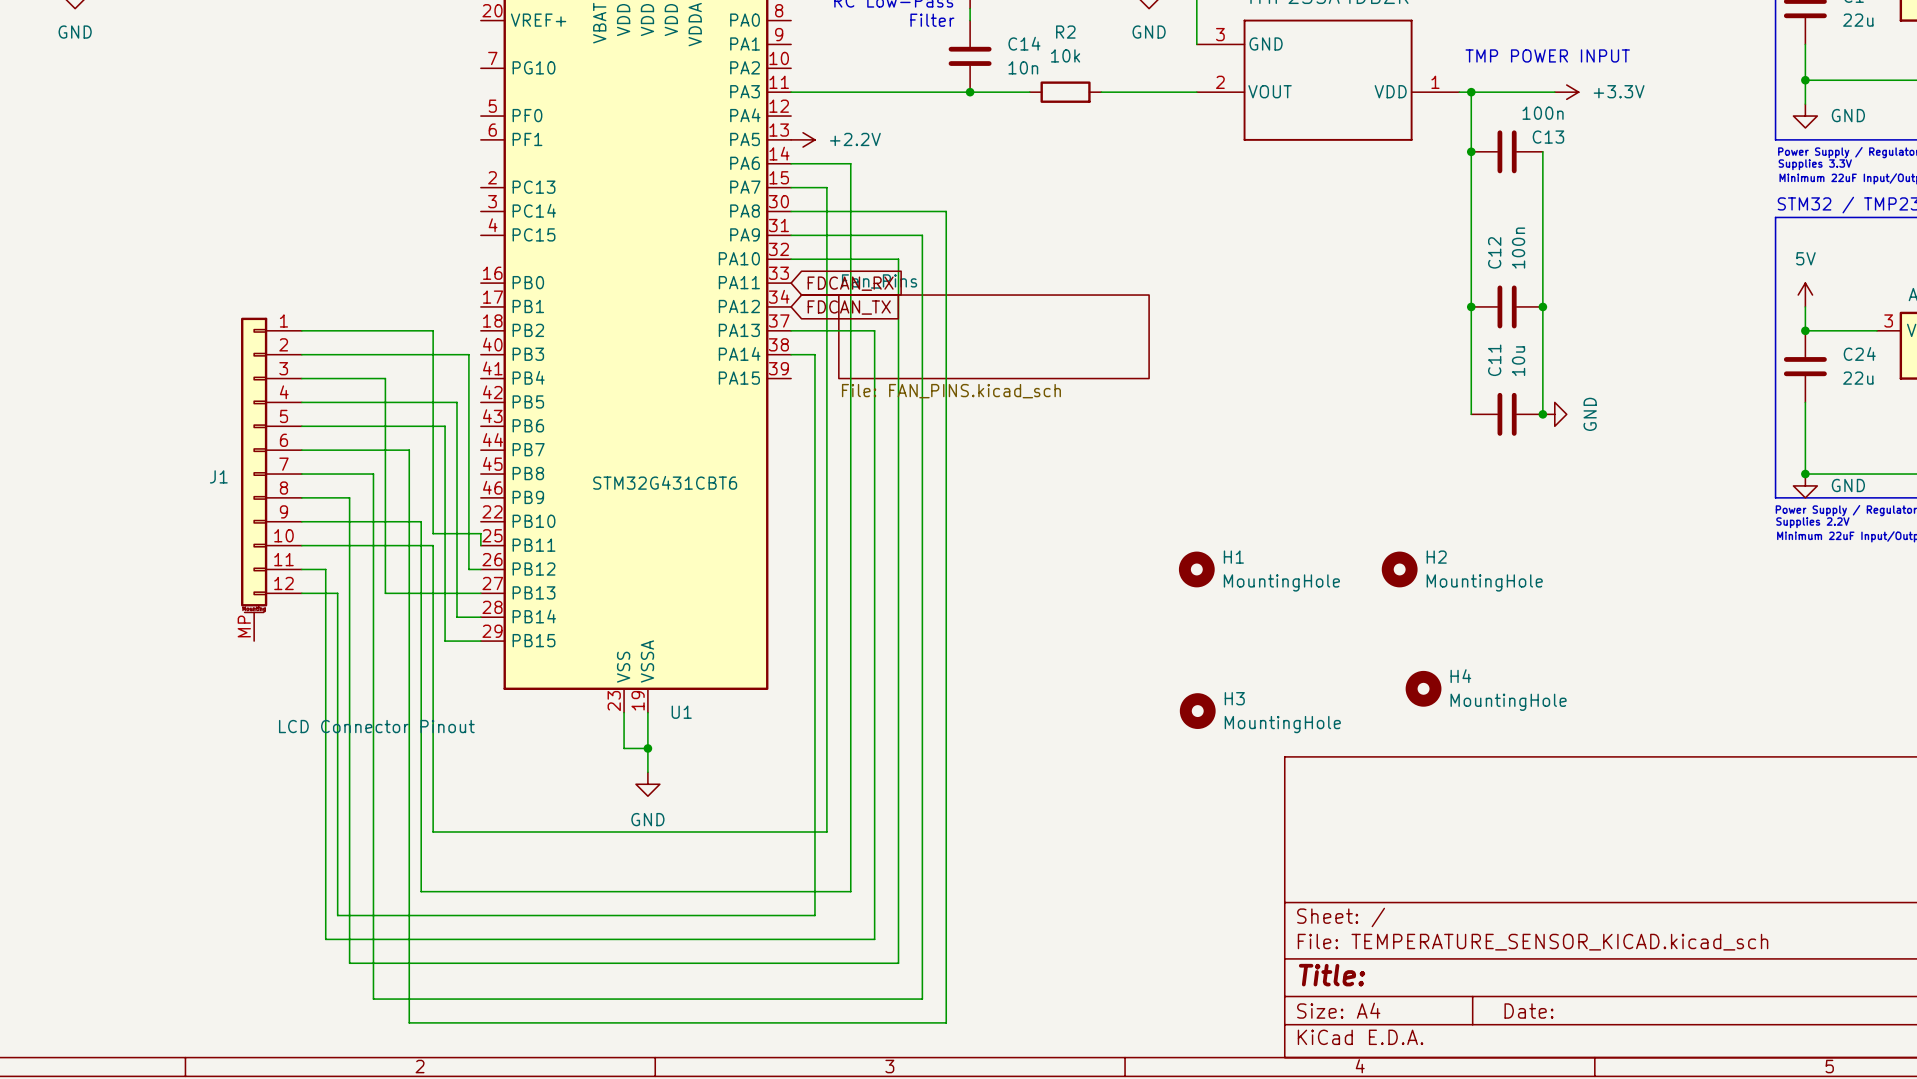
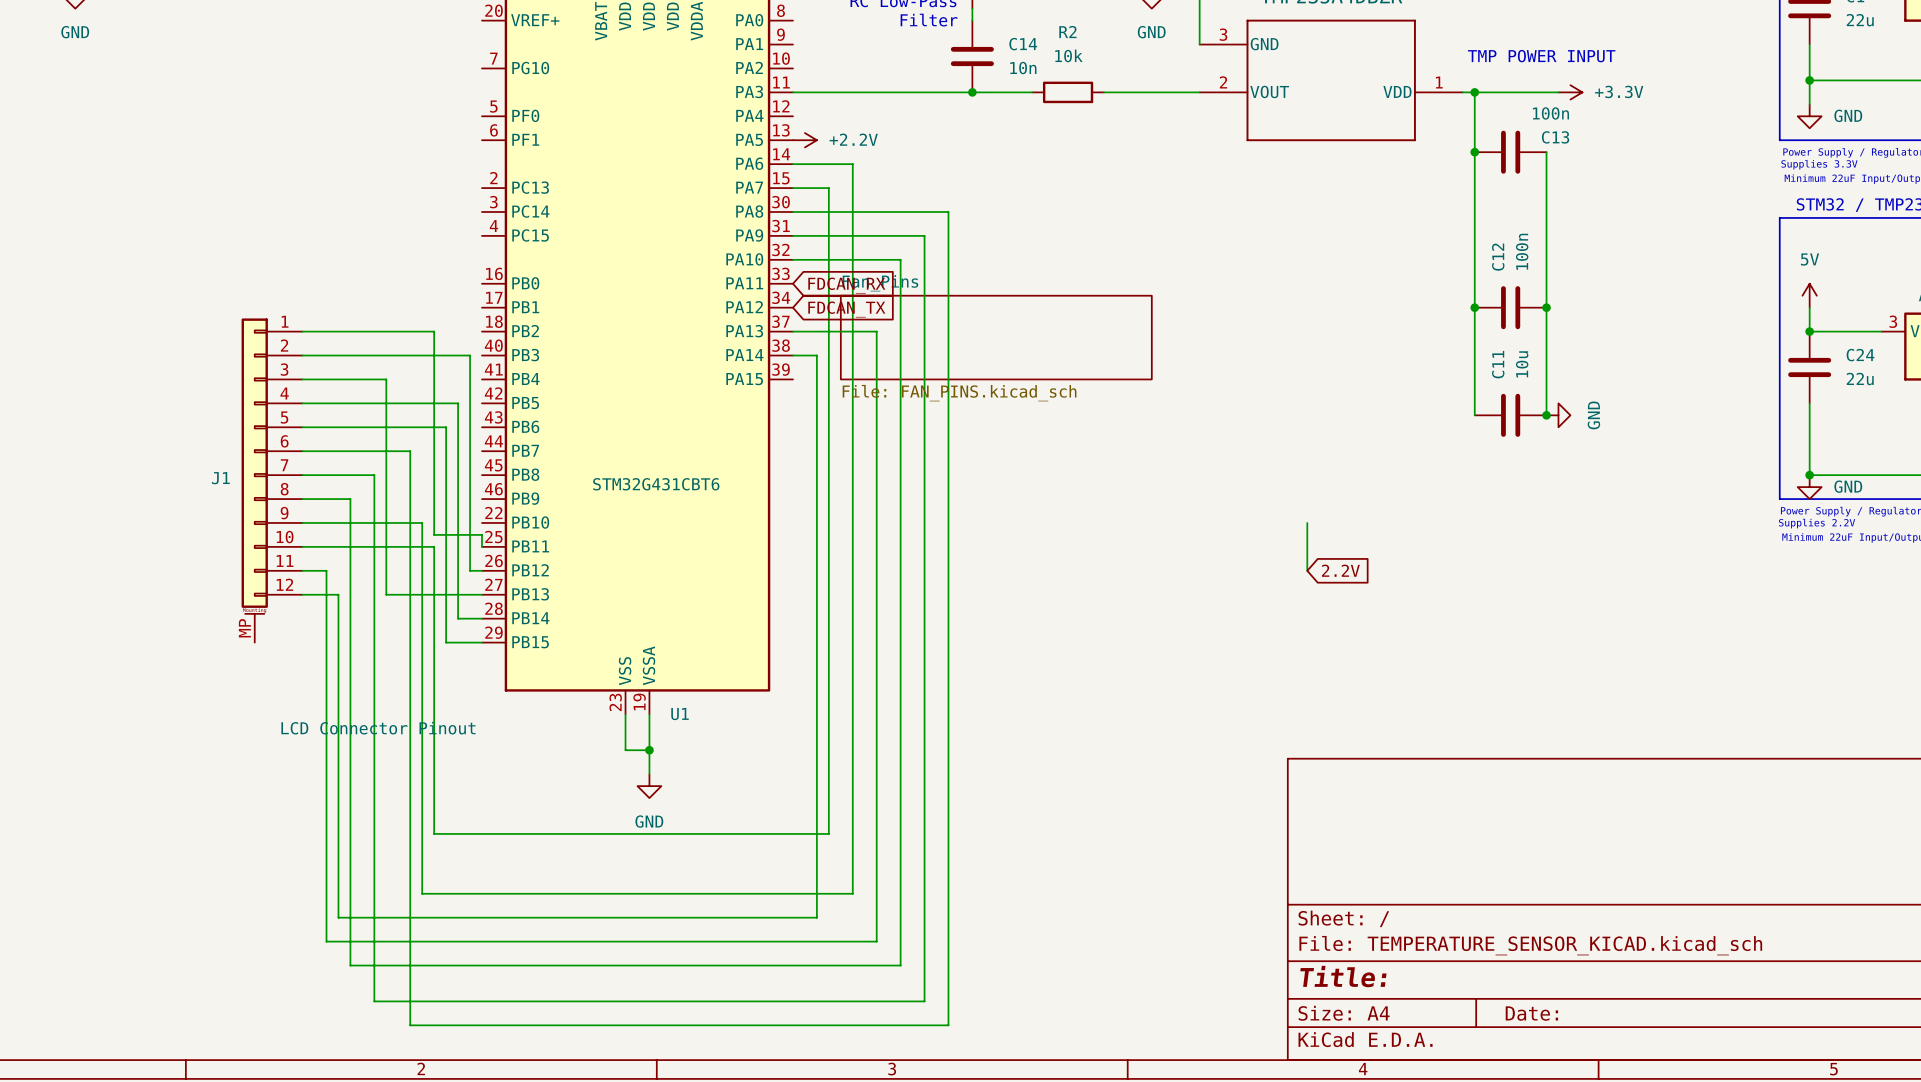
wire: none -> (1307, 522) (1307, 570)
H1: MountingHole (1196, 569) -> none
global label: none -> 2.2V (1340, 570)
H2: MountingHole (1399, 569) -> none
H4: MountingHole (1423, 688) -> none
H3: MountingHole (1197, 711) -> none

